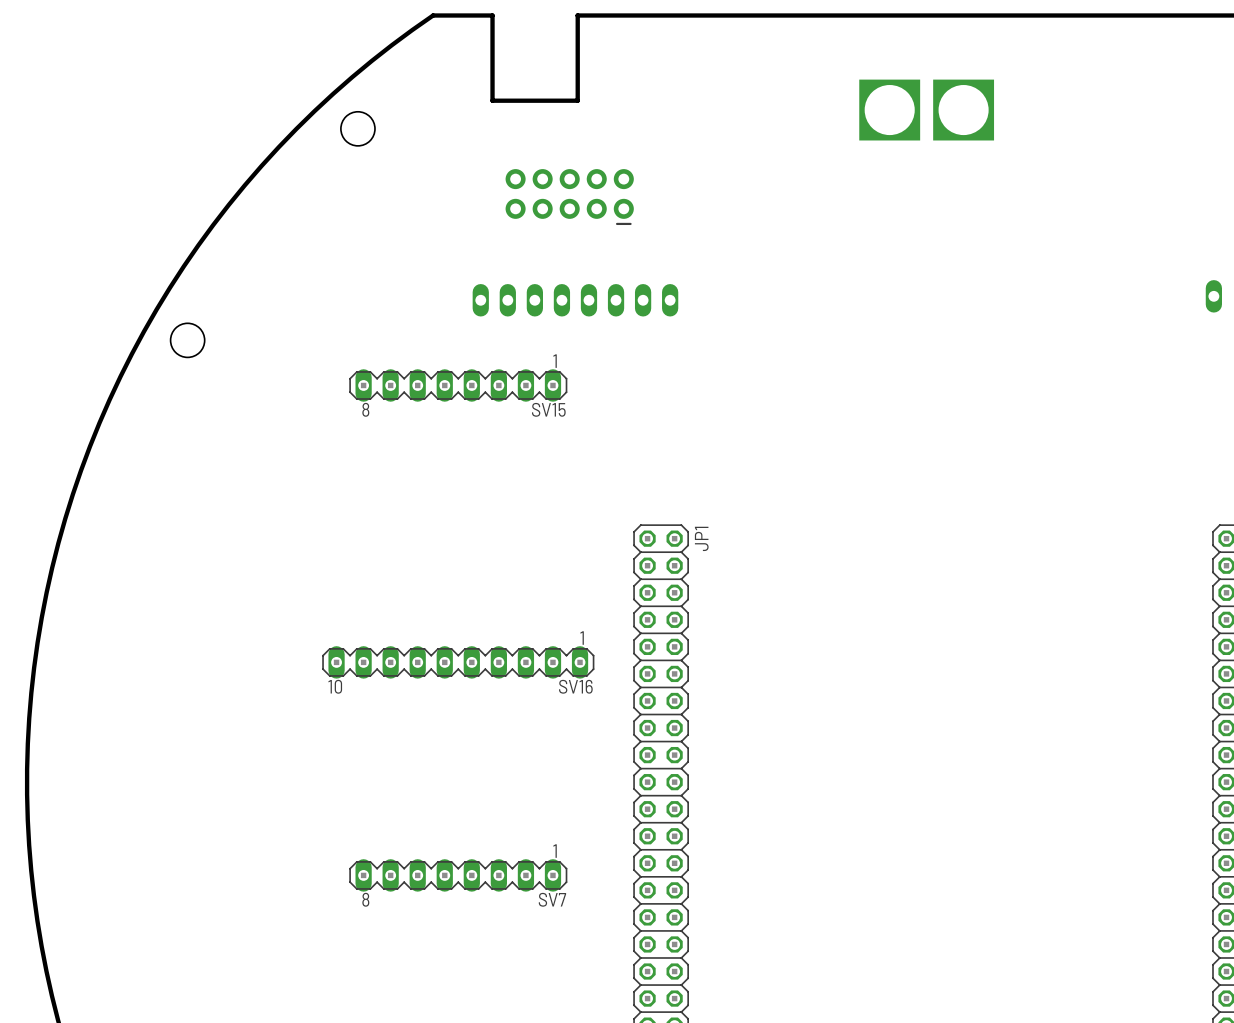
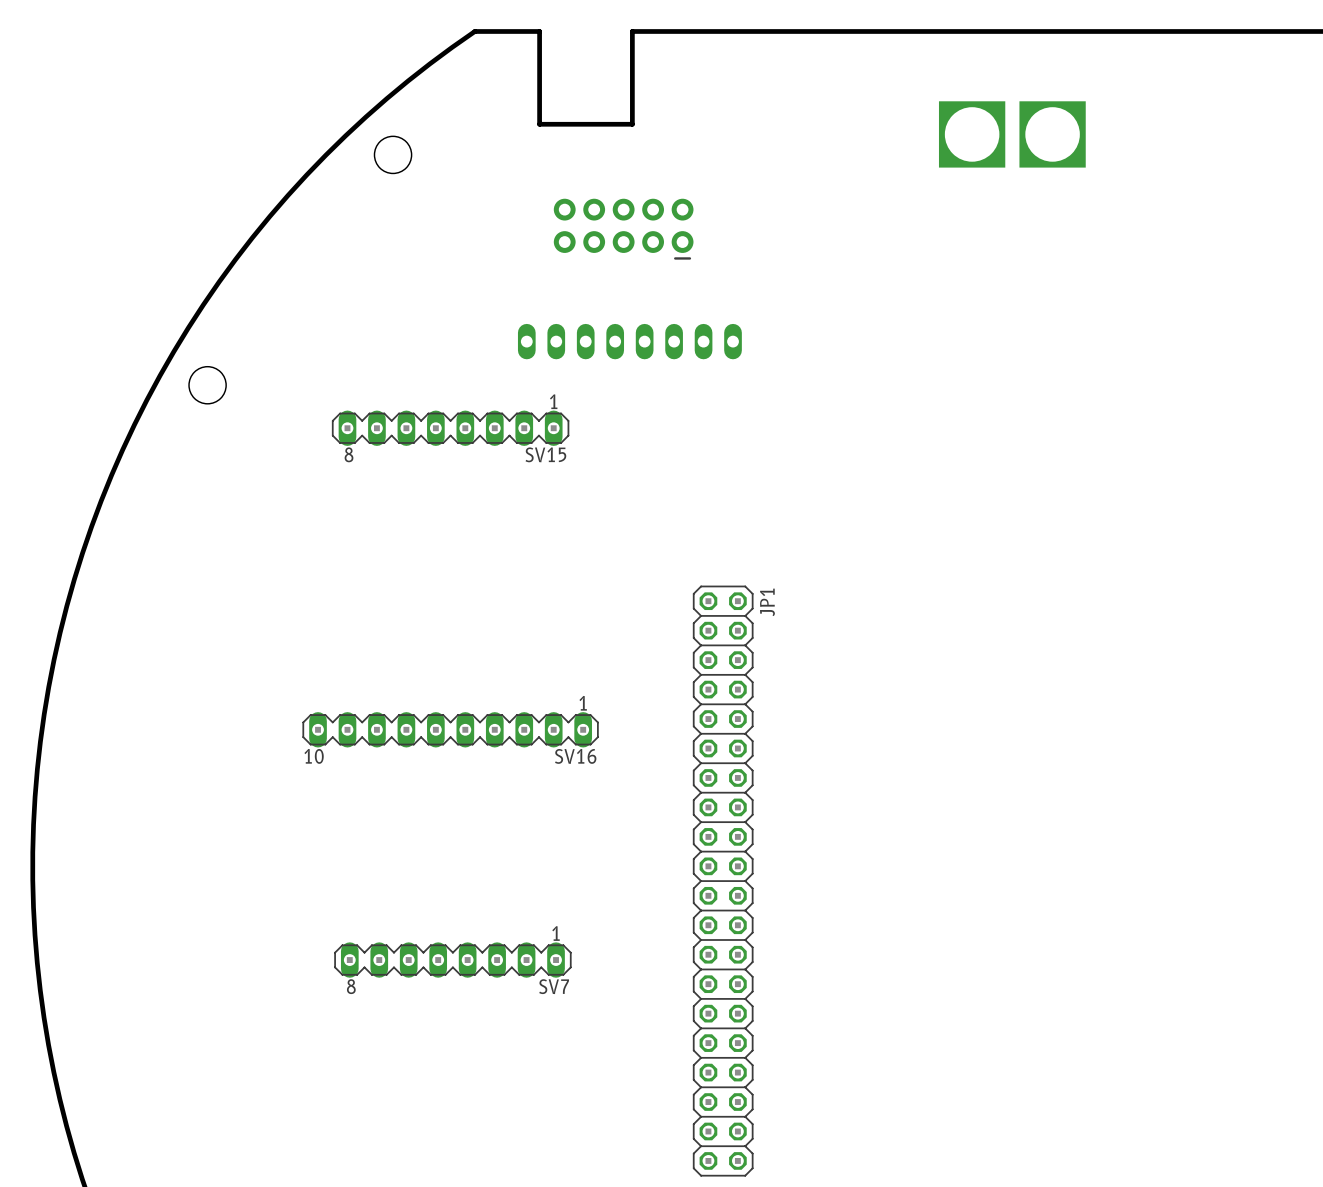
SV15 position: (458, 385) -> (450, 428)
SV16 position: (458, 662) -> (450, 729)
SV7 position: (458, 875) -> (452, 960)

